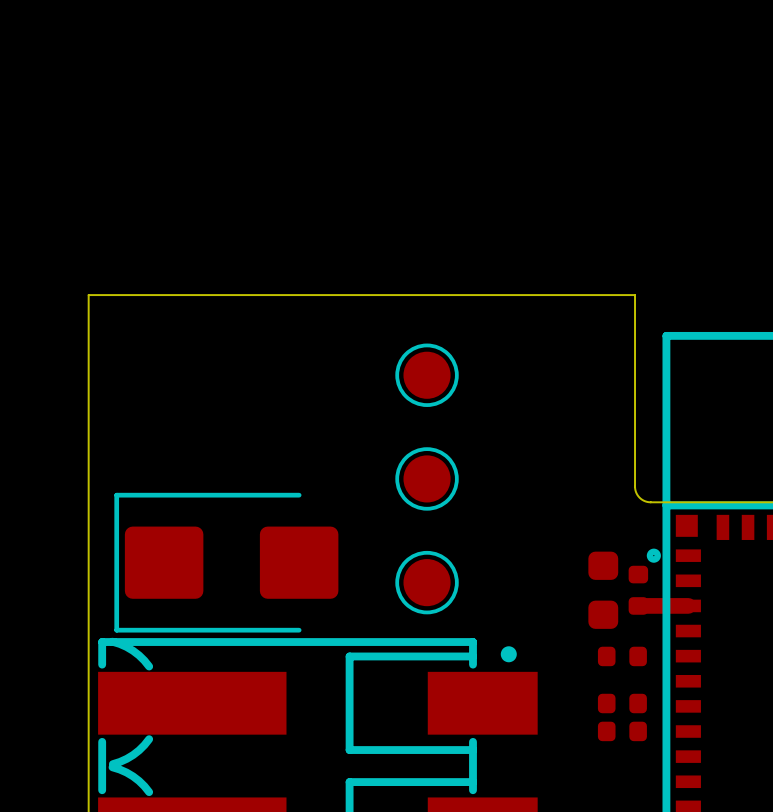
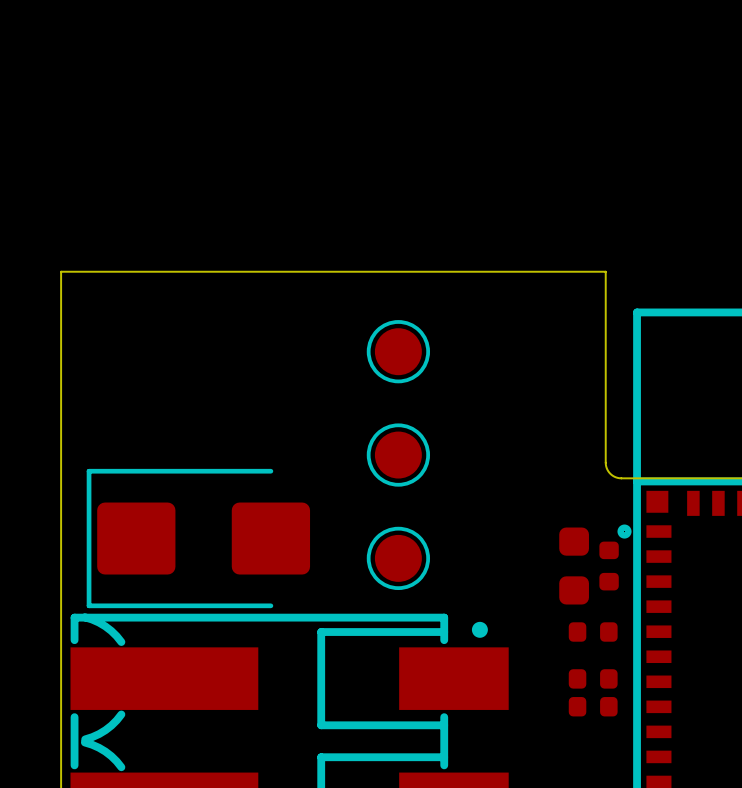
track: (638, 605) (688, 605) -> none

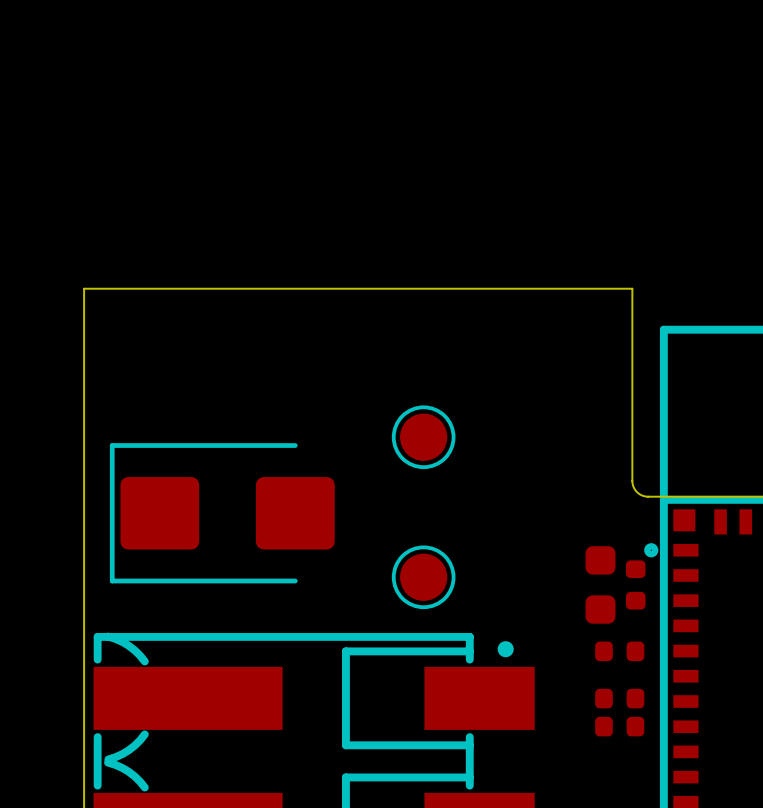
part: (398, 351) -> none
part: none -> (423, 437)
part: (398, 455) -> none
part position: (198, 538) -> (222, 513)

